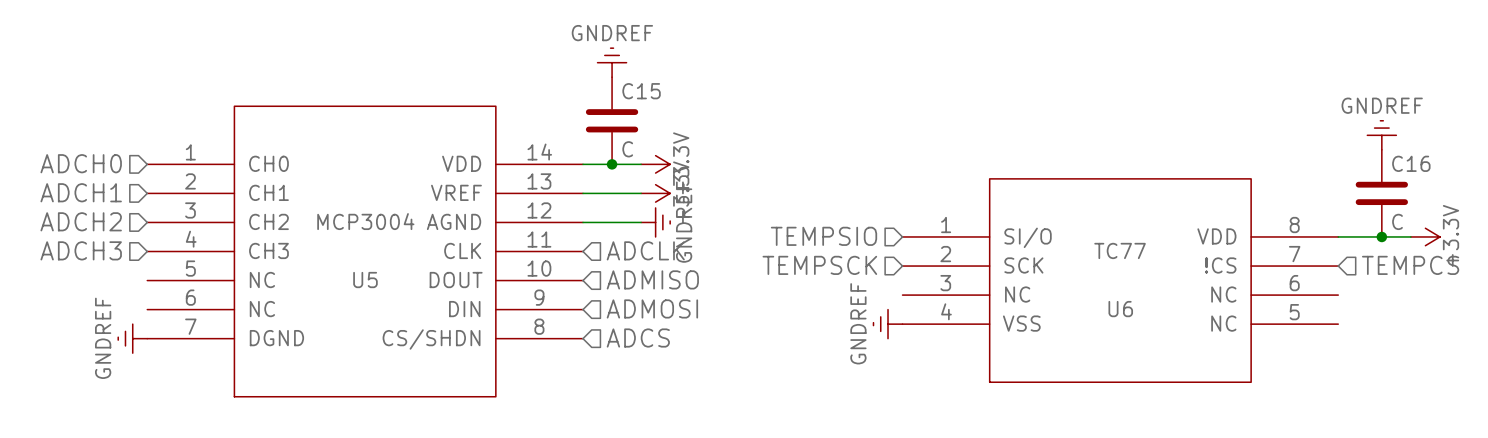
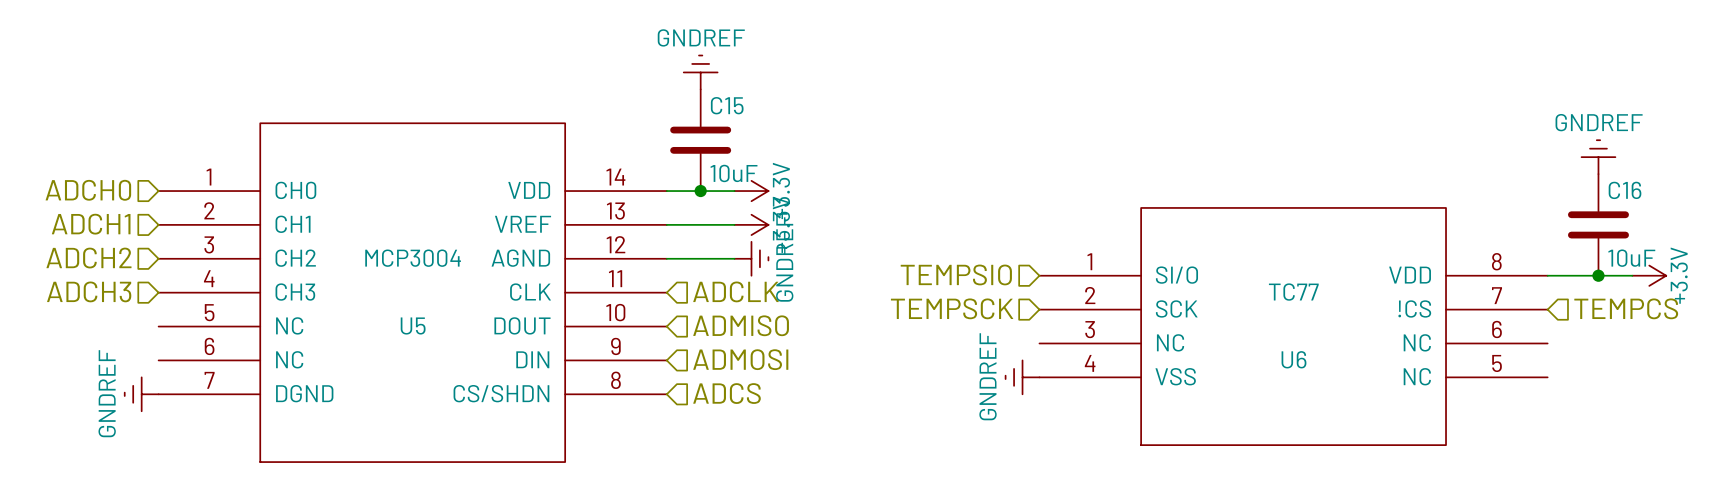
C15 value: C (627, 149) -> 10uF (734, 173)
C16 value: C (1397, 221) -> 10uF (1631, 258)

